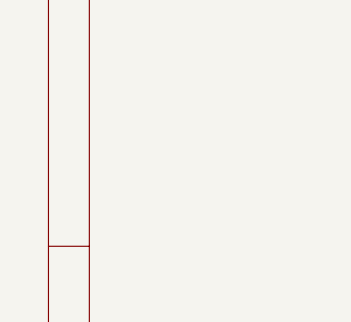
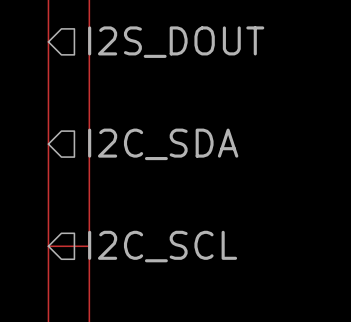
hierarchical label: none -> I2S_DOUT (176, 42)
hierarchical label: none -> I2C_SDA (163, 144)
hierarchical label: none -> I2C_SCL (162, 246)

